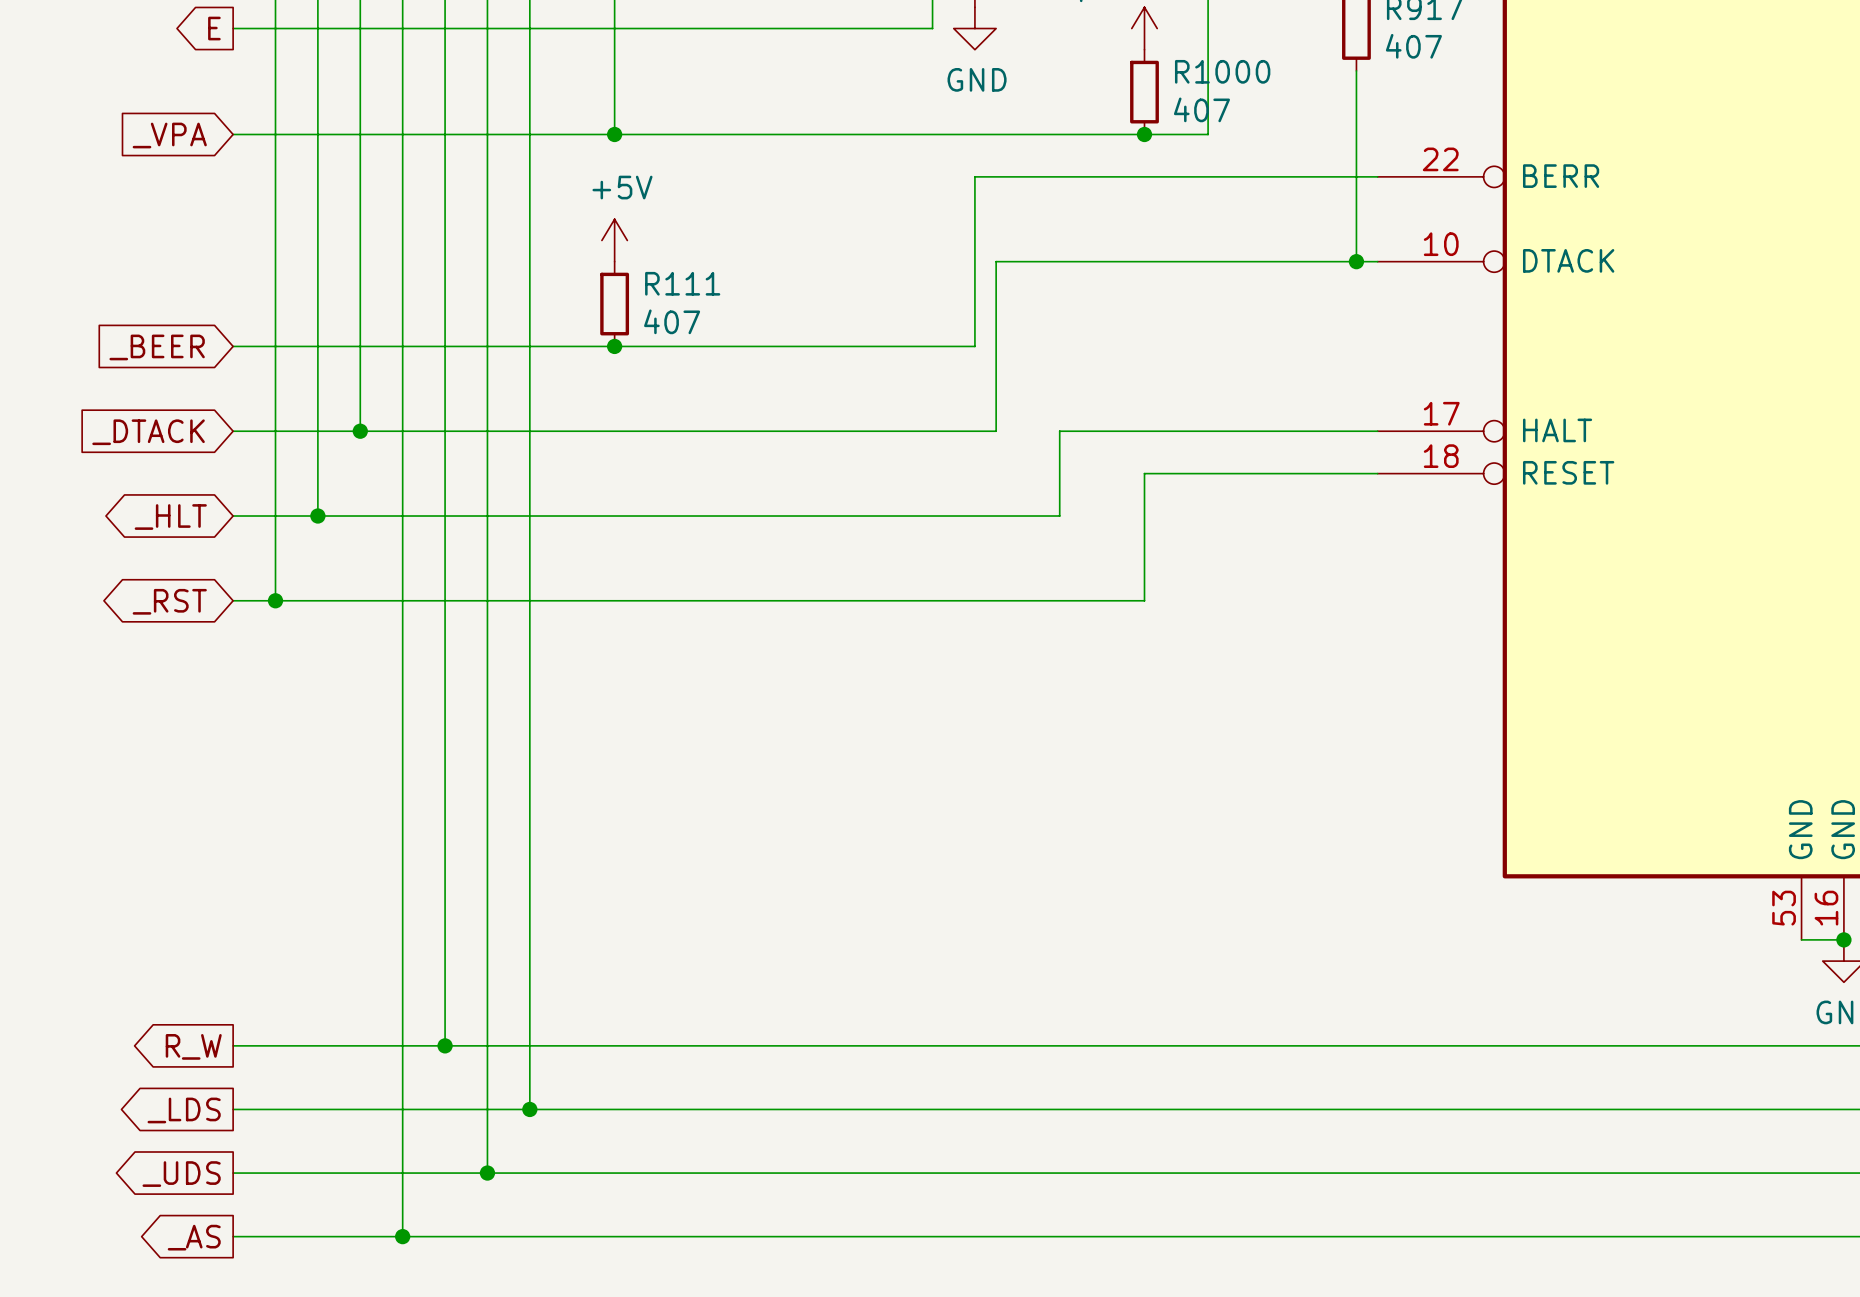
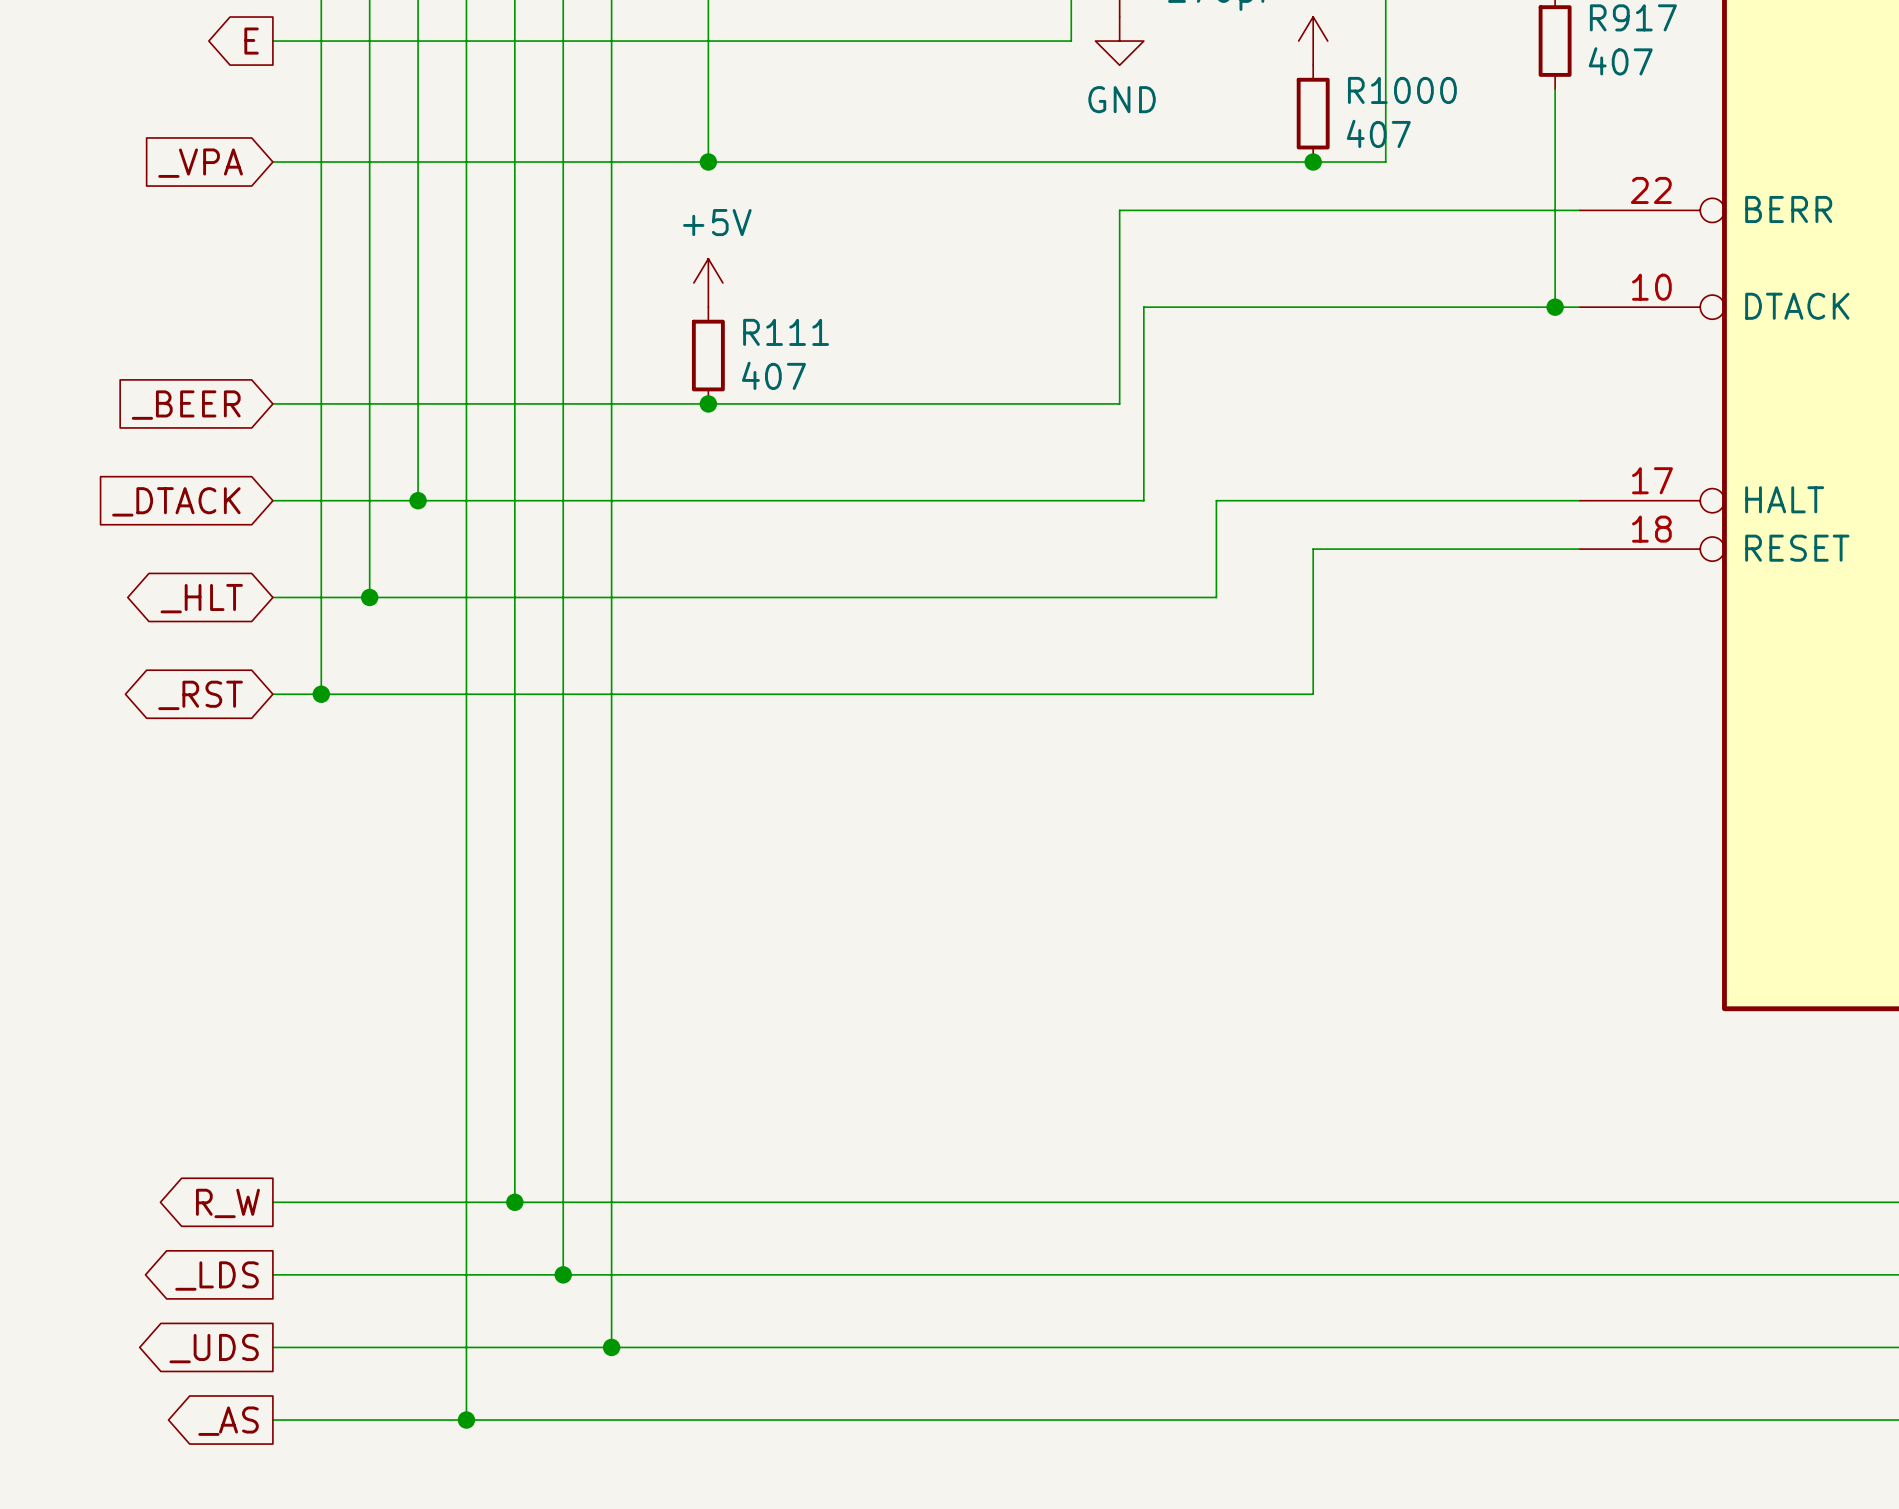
wire: (487, 1109) (487, 1173) -> (611, 1274) (611, 1347)
junction: none -> (563, 1274)
junction: (529, 1109) -> none
junction: (487, 1173) -> none
junction: none -> (611, 1347)

